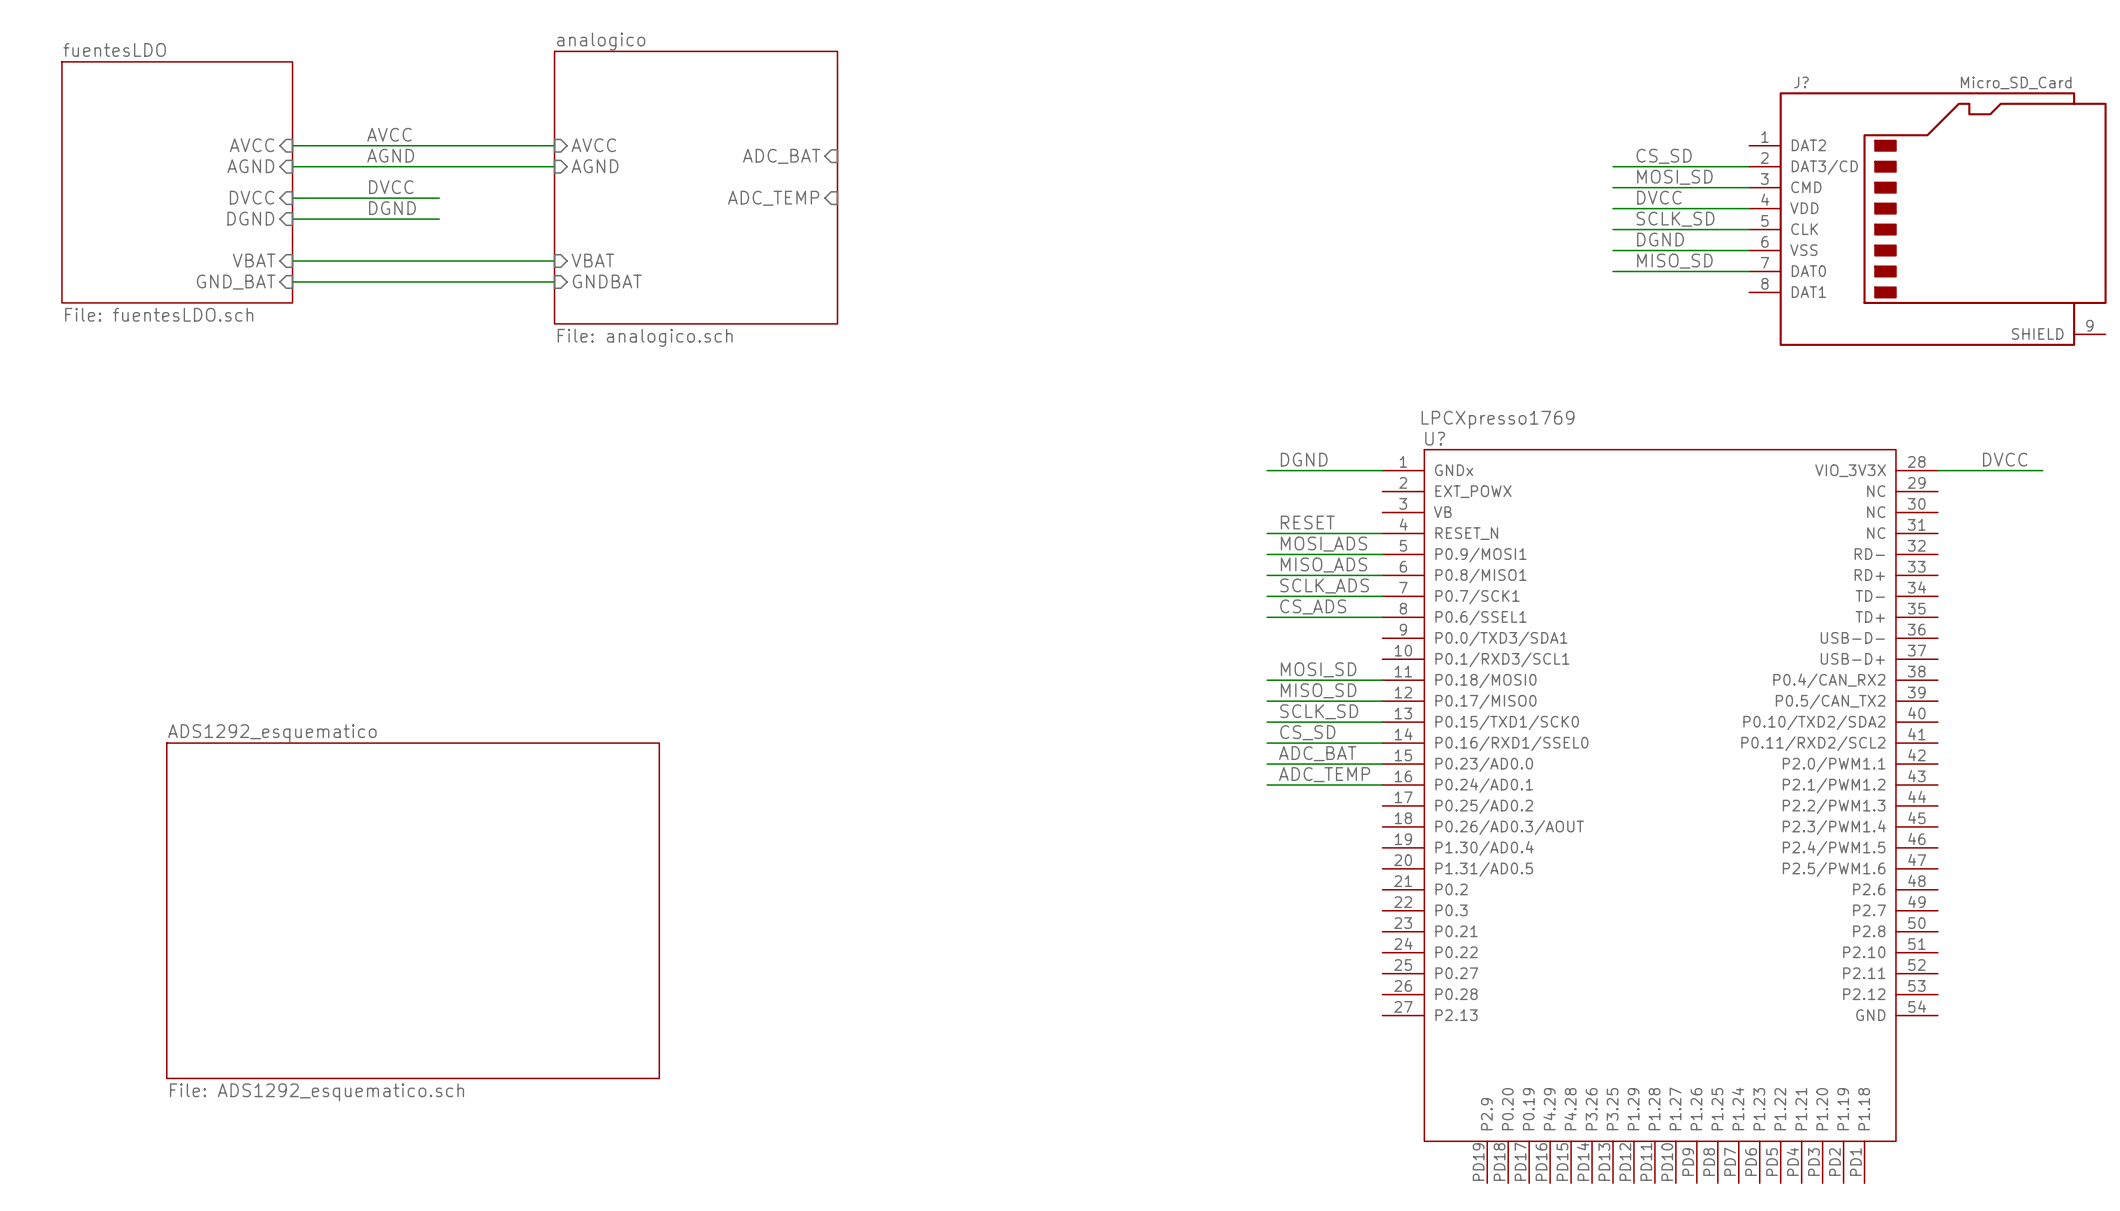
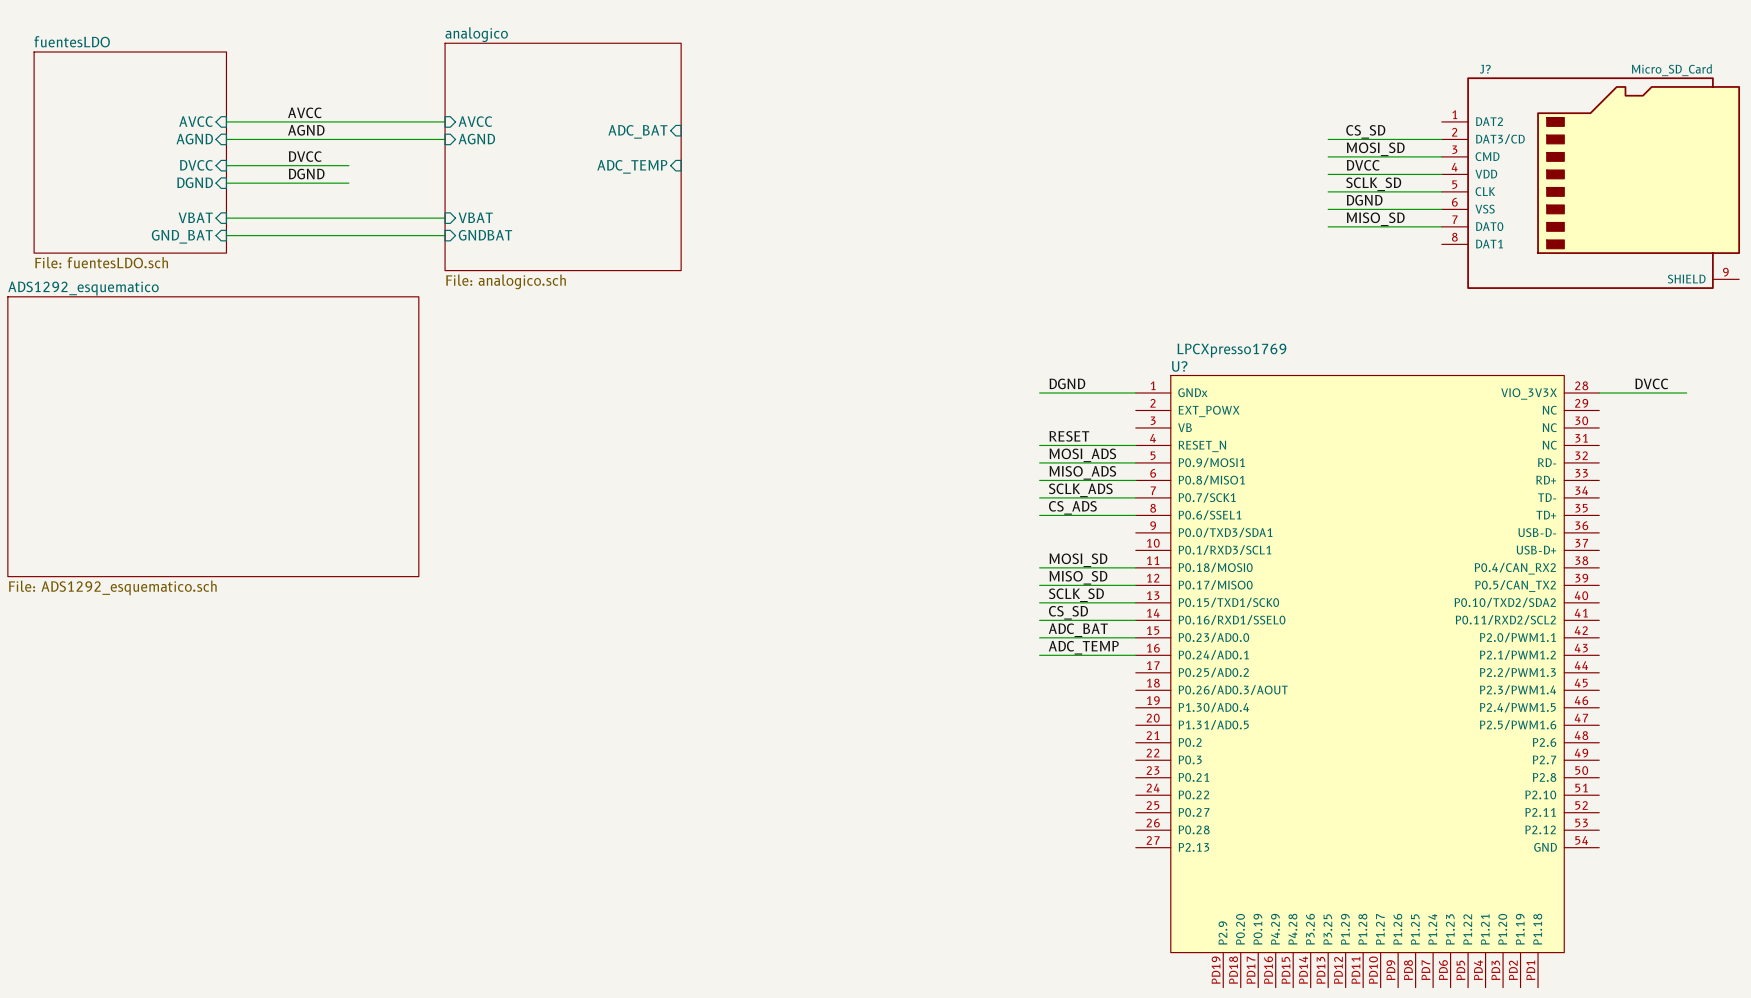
sheet ADS1292_esquematico position: (413, 910) -> (213, 436)

